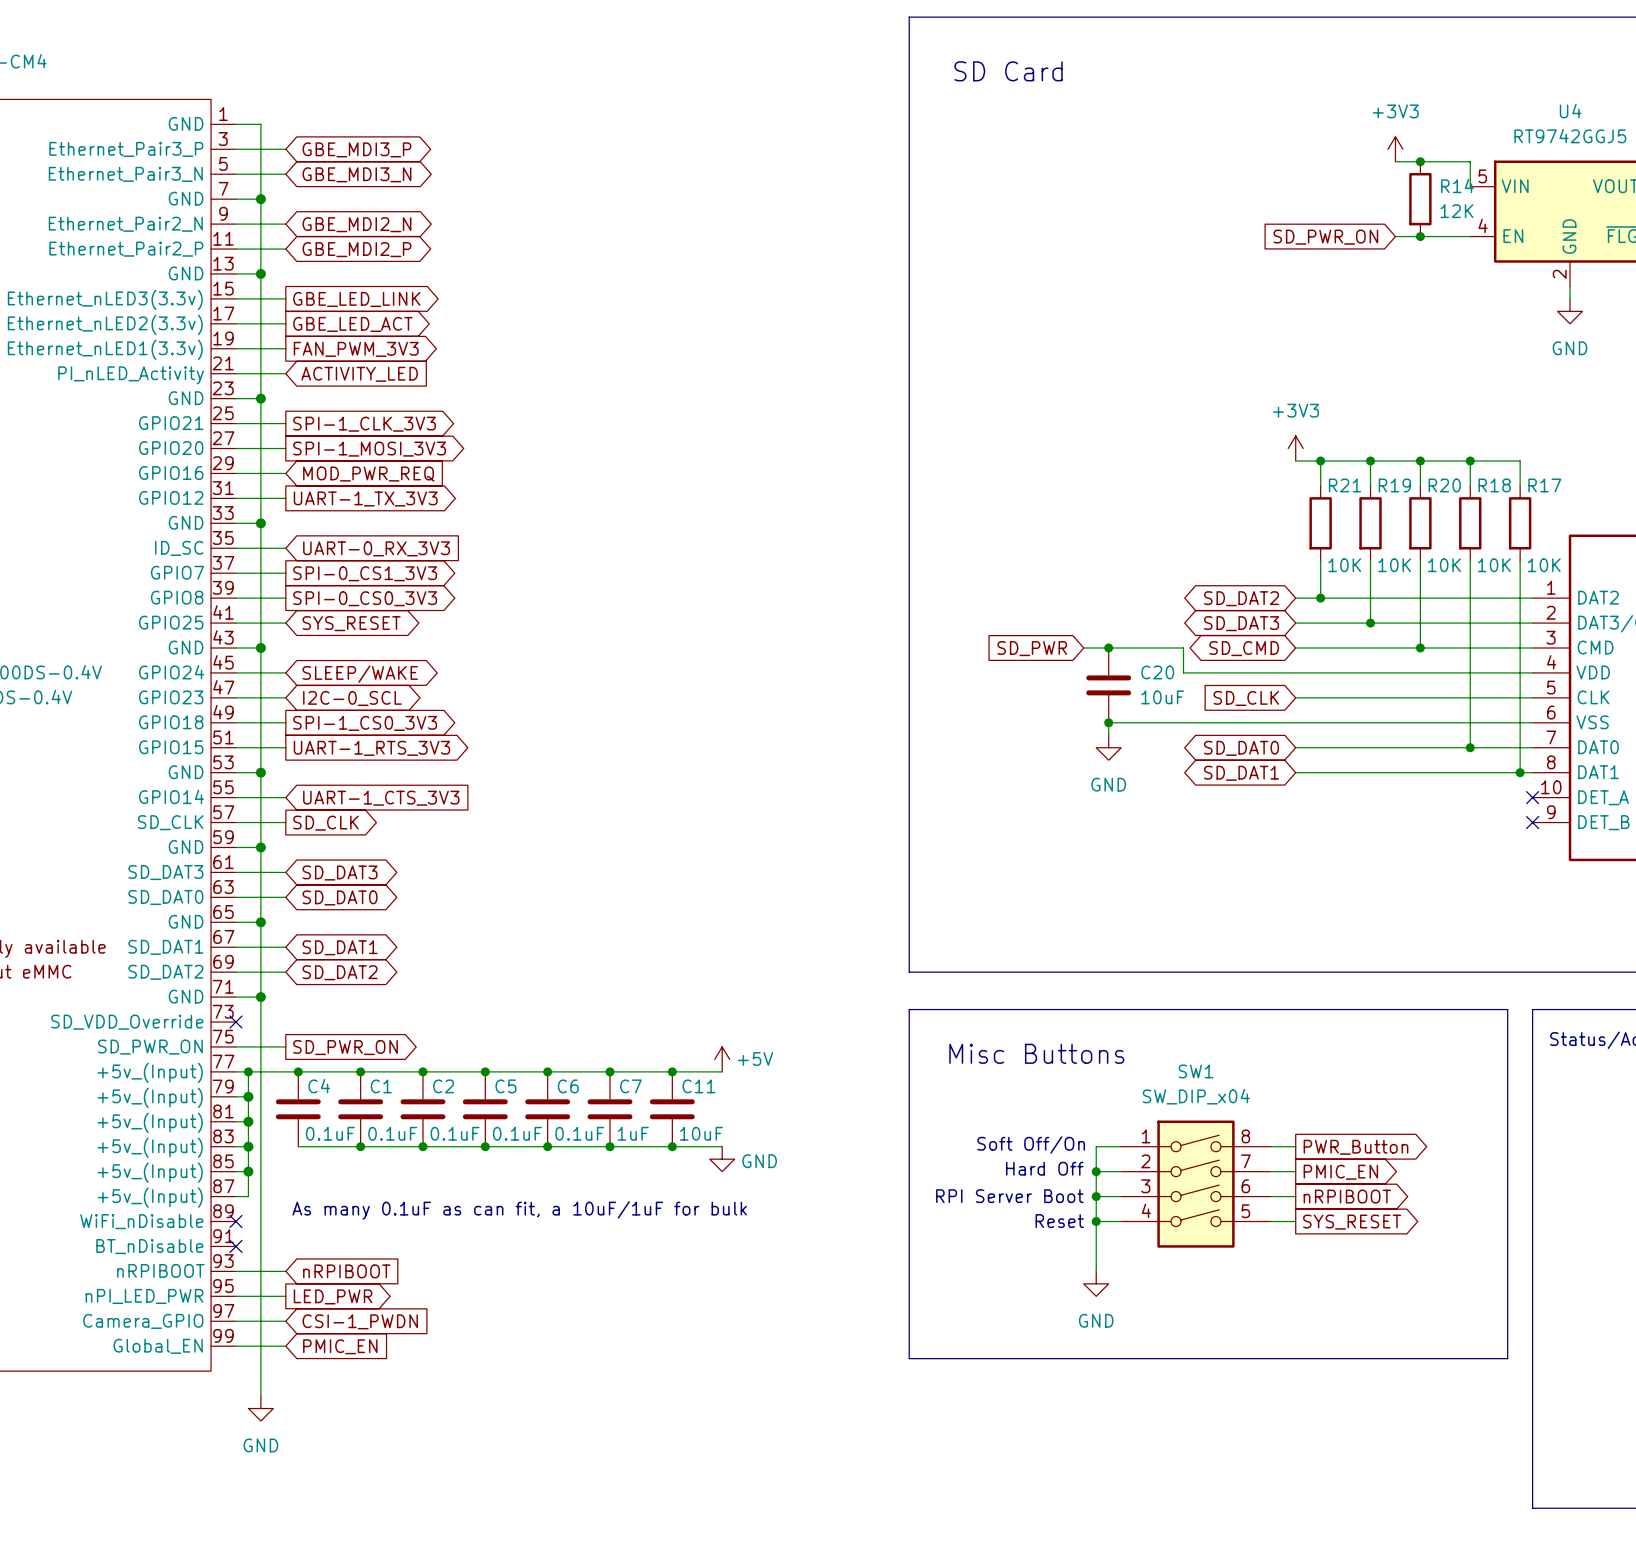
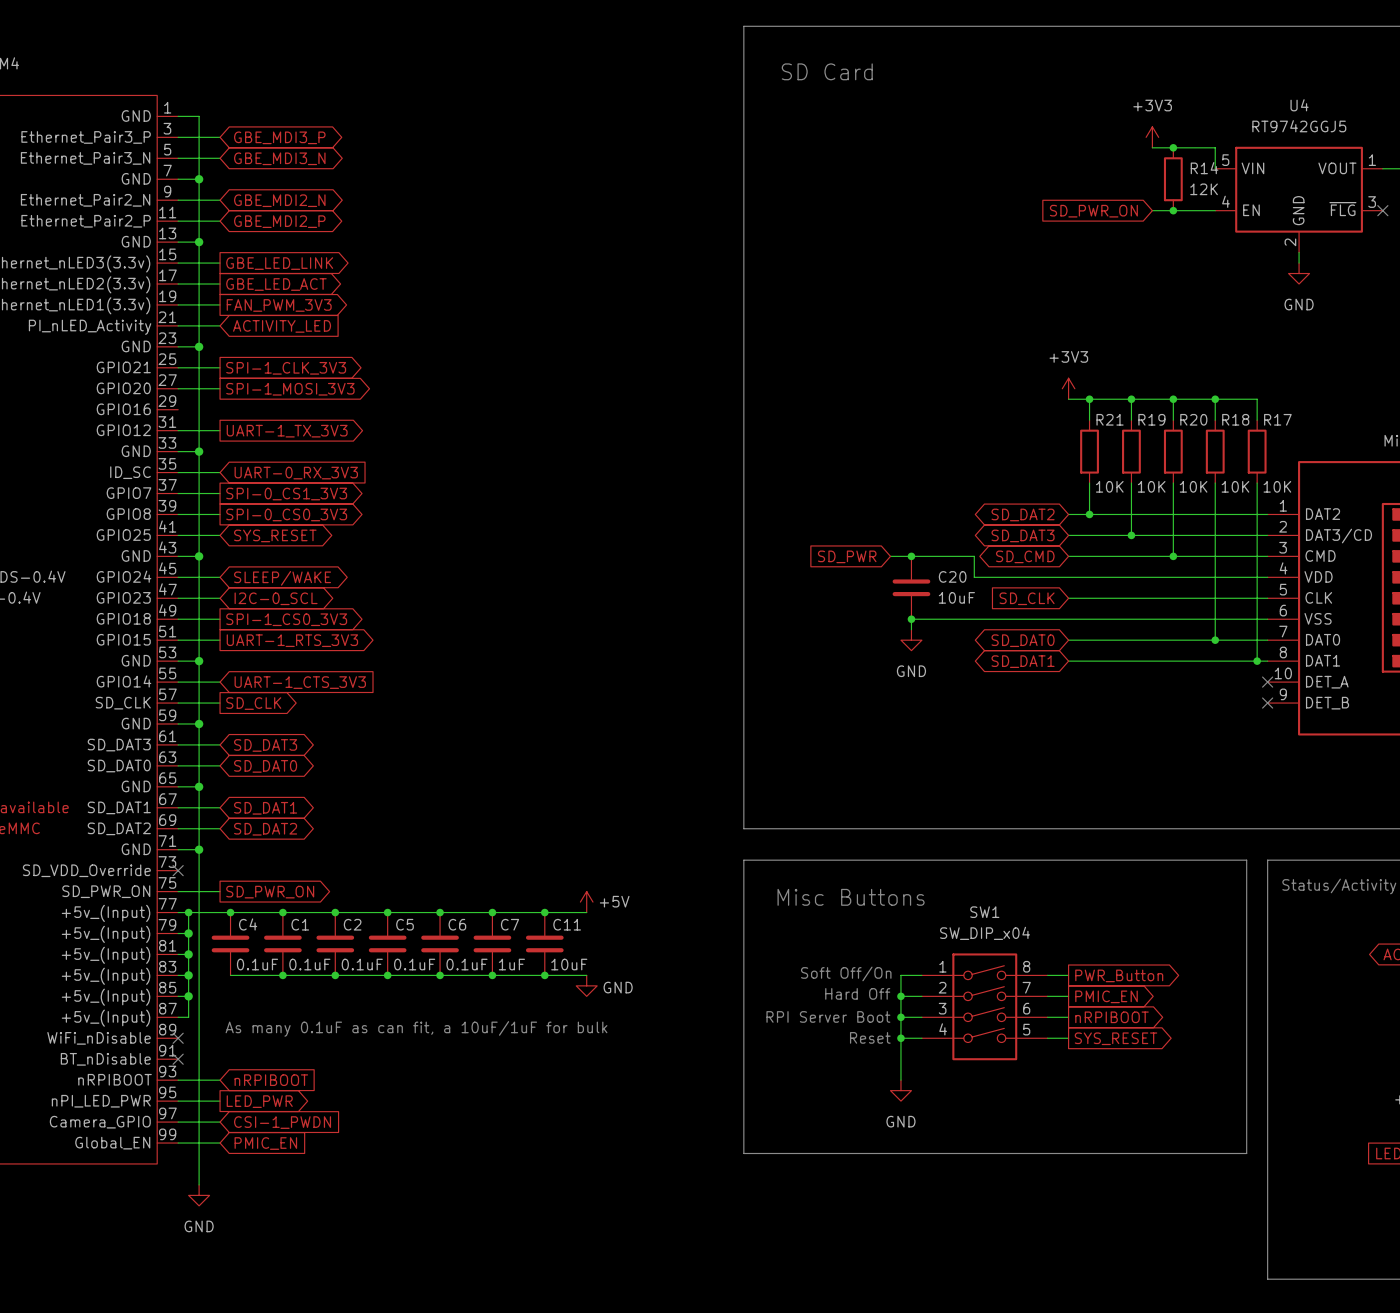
wire: (235, 473) (285, 473) -> none
global label: MOD_PWR_REQ (368, 474) -> none

